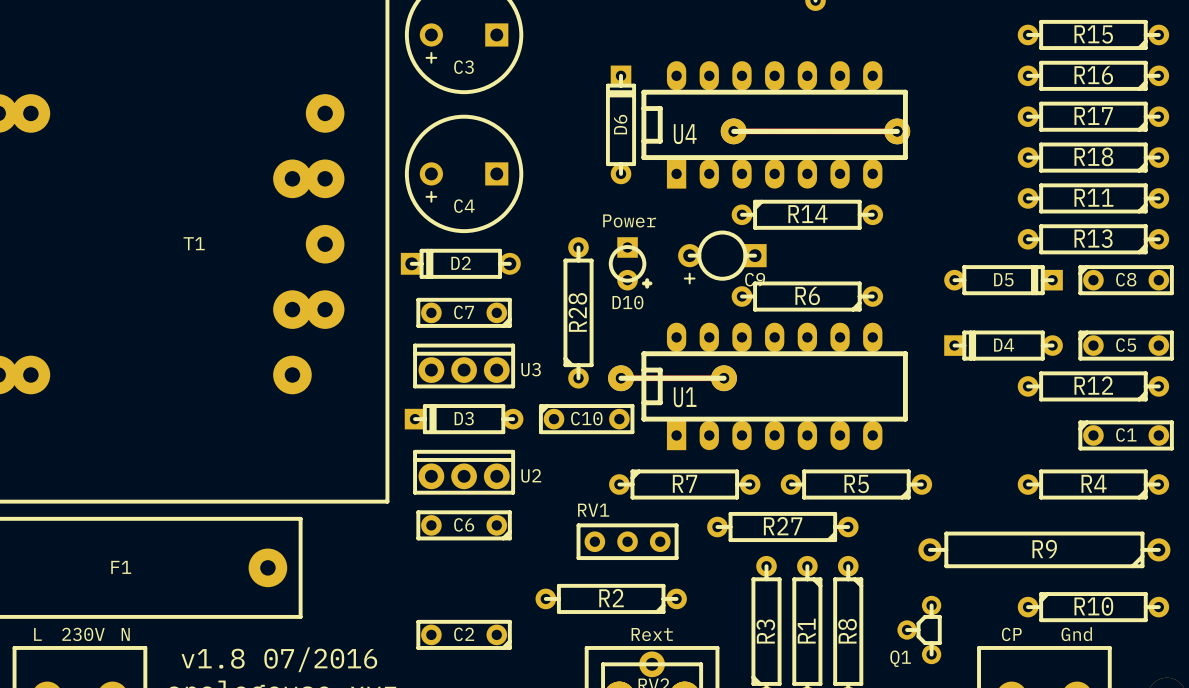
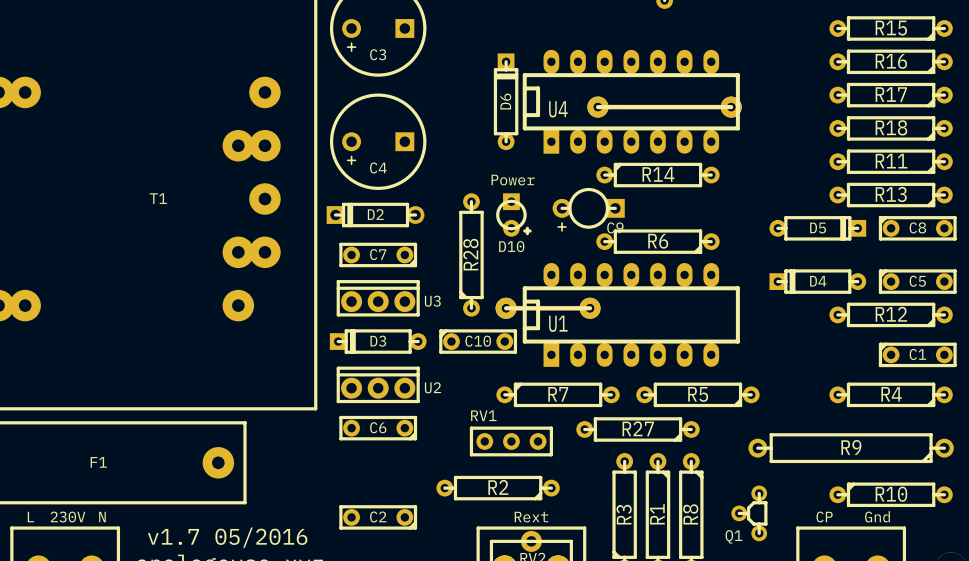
text: v1.8 07/2016 (279, 659) -> v1.7 05/2016 (227, 537)

